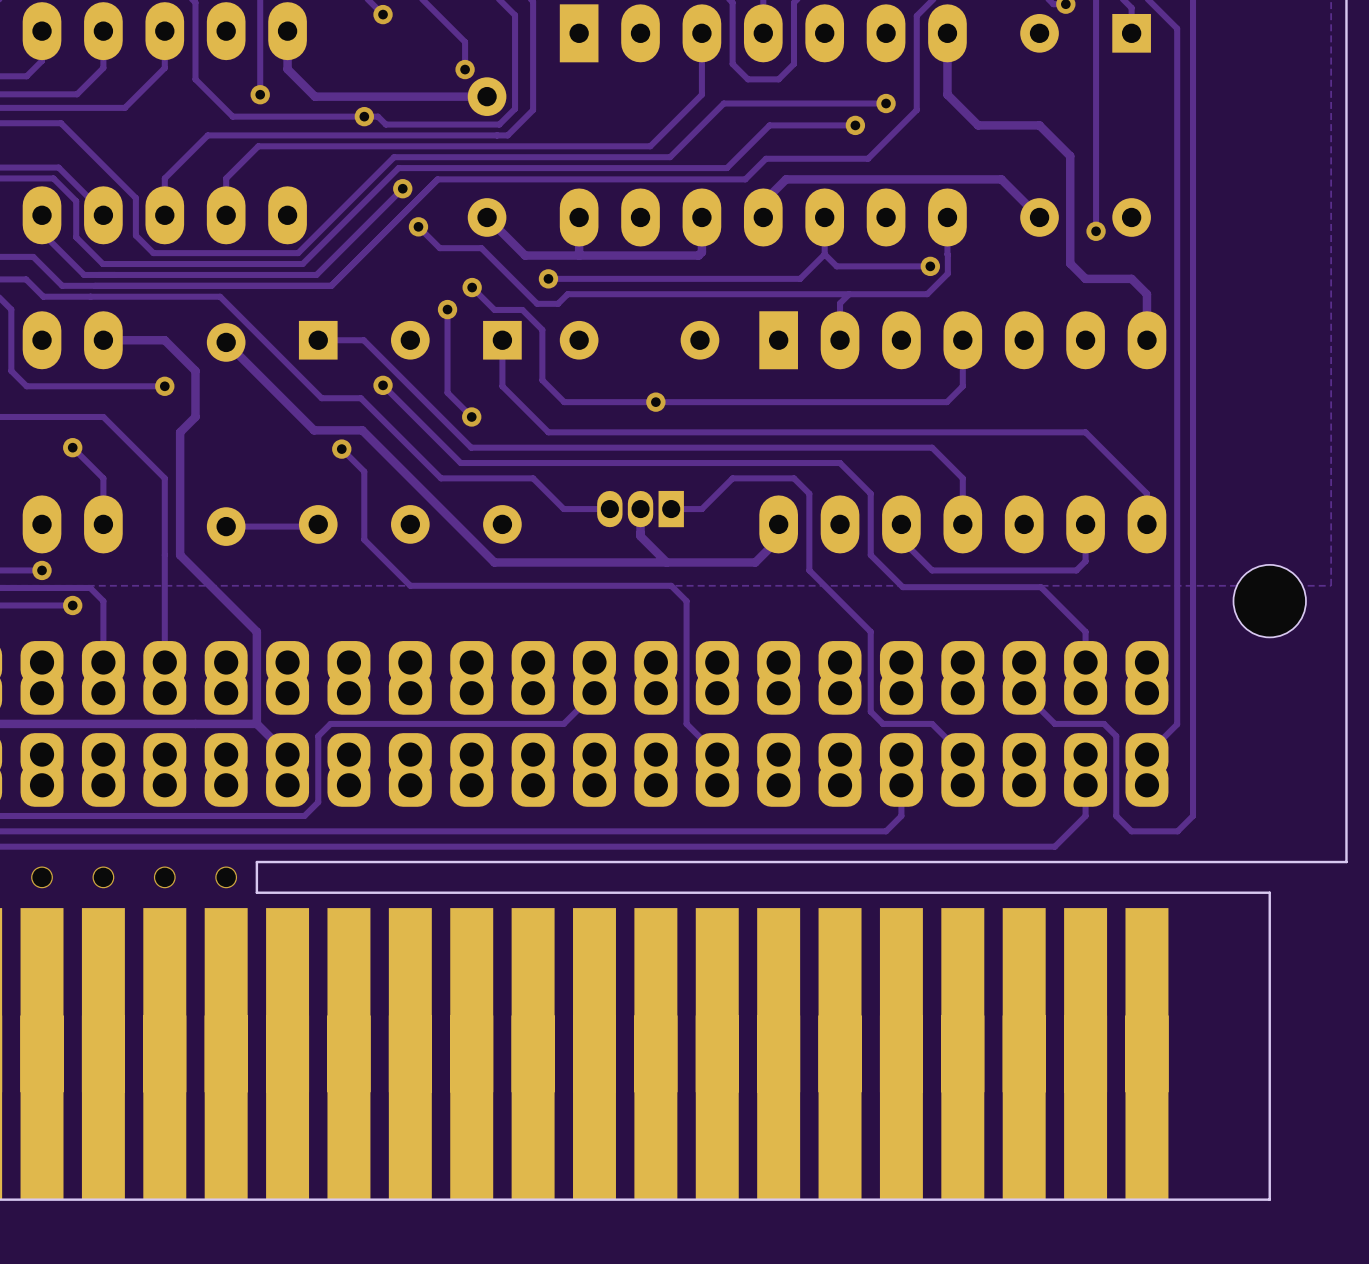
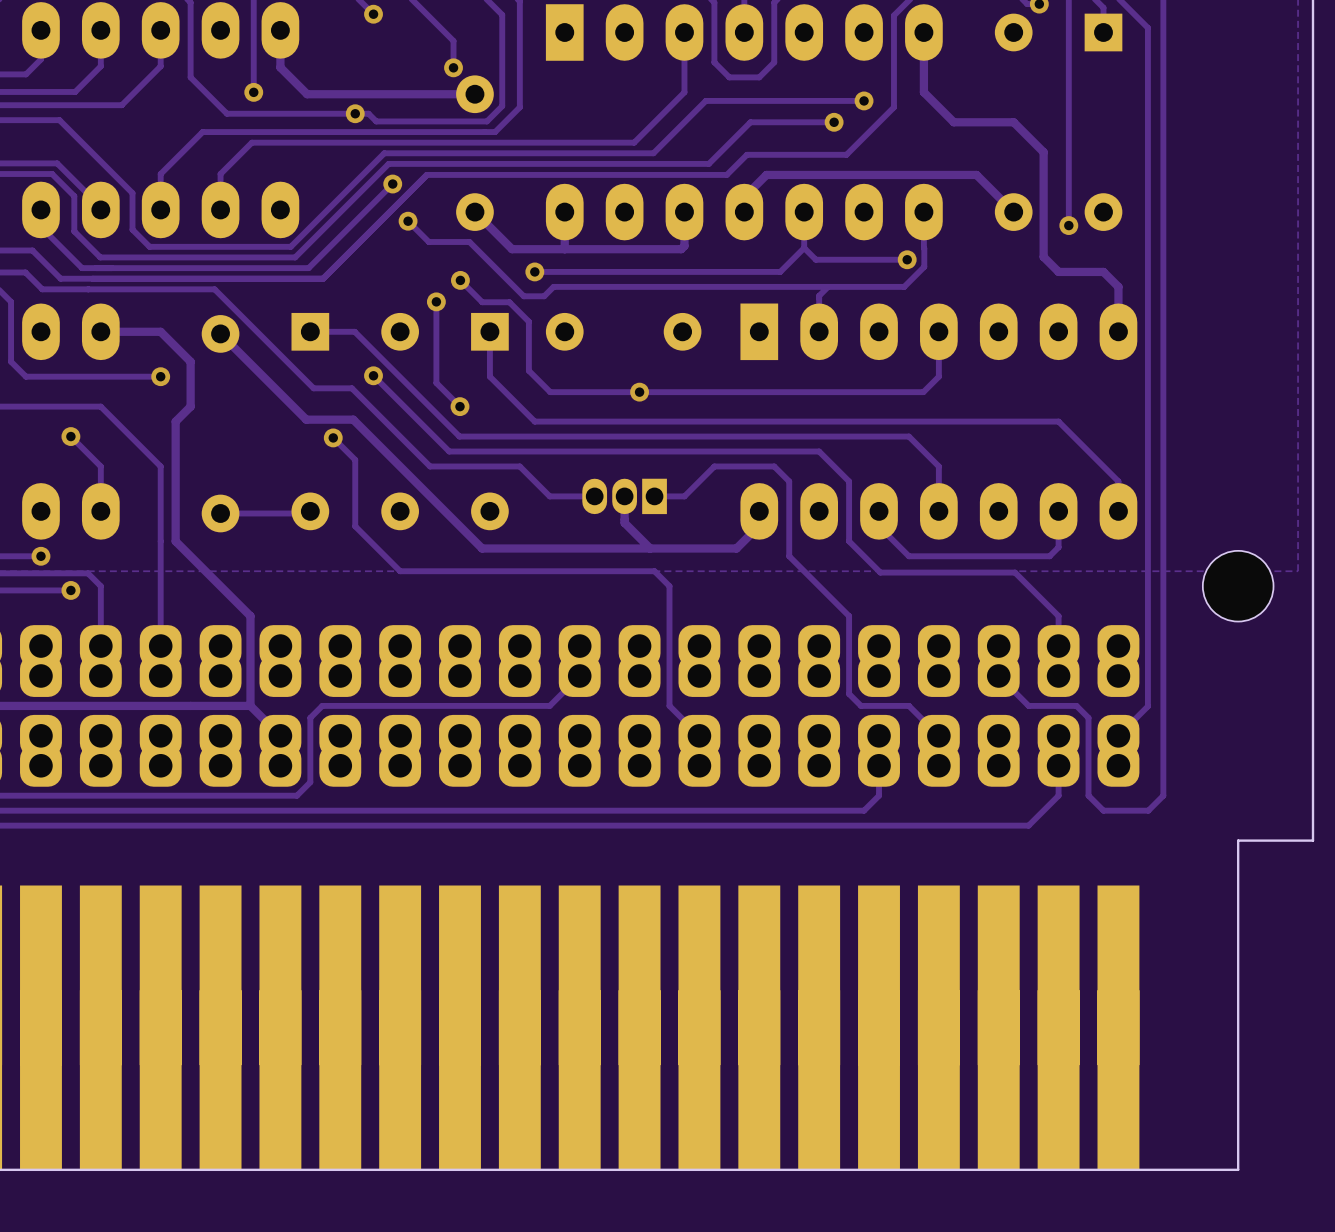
board edge: (1269, 862) (256, 862) (256, 892) (1269, 892) -> (1238, 840) (1238, 870)
via: (42, 877) -> none
via: (103, 877) -> none
via: (164, 877) -> none
via: (226, 877) -> none

